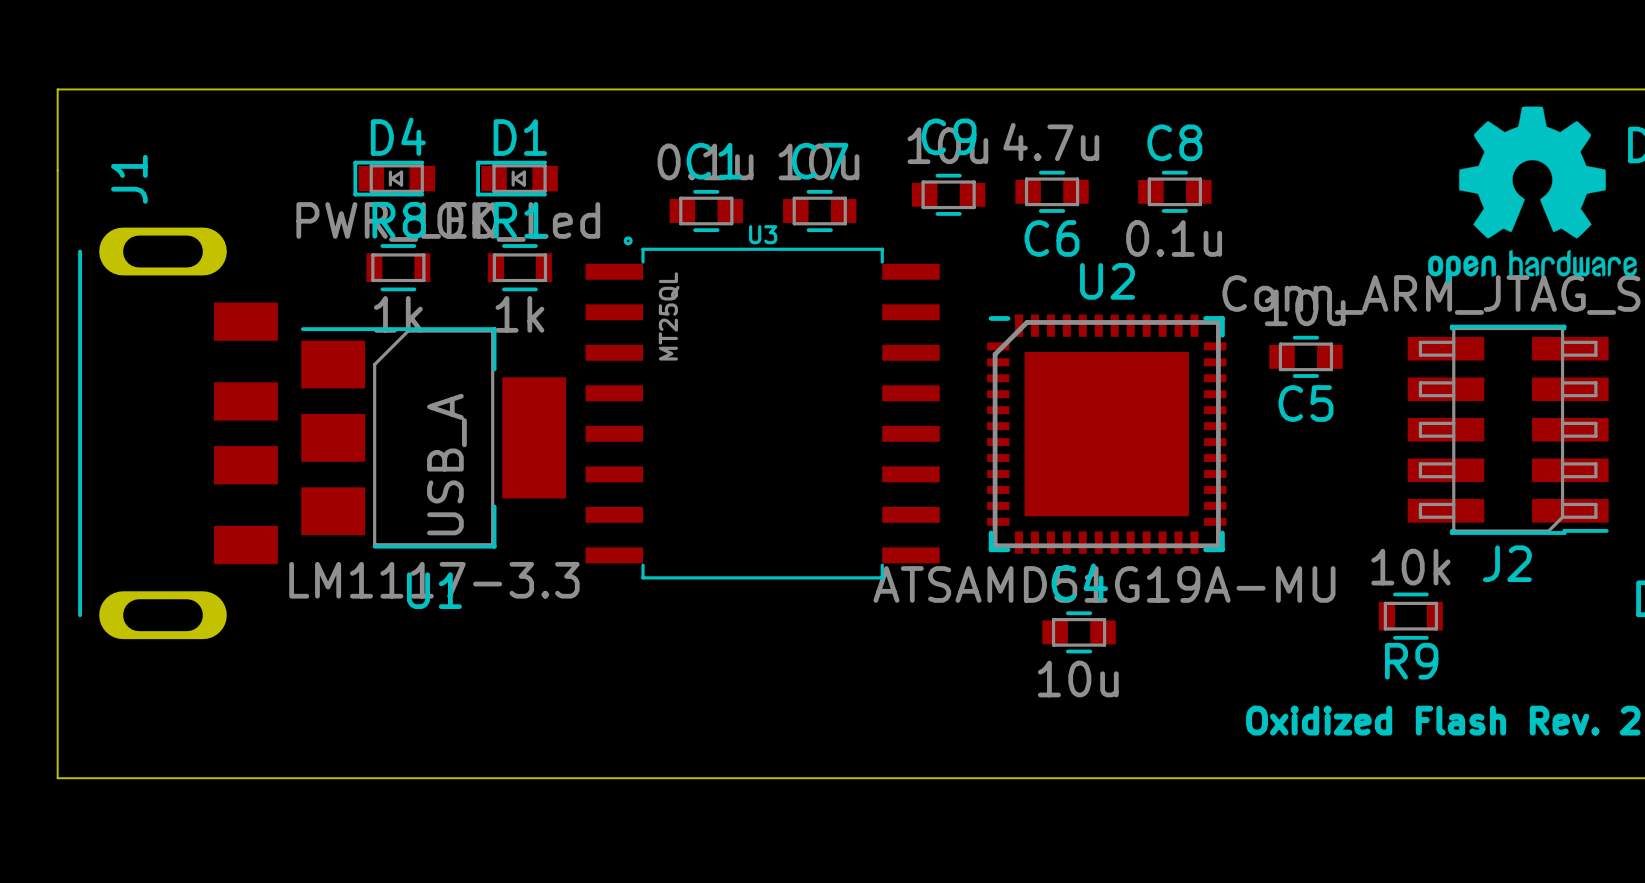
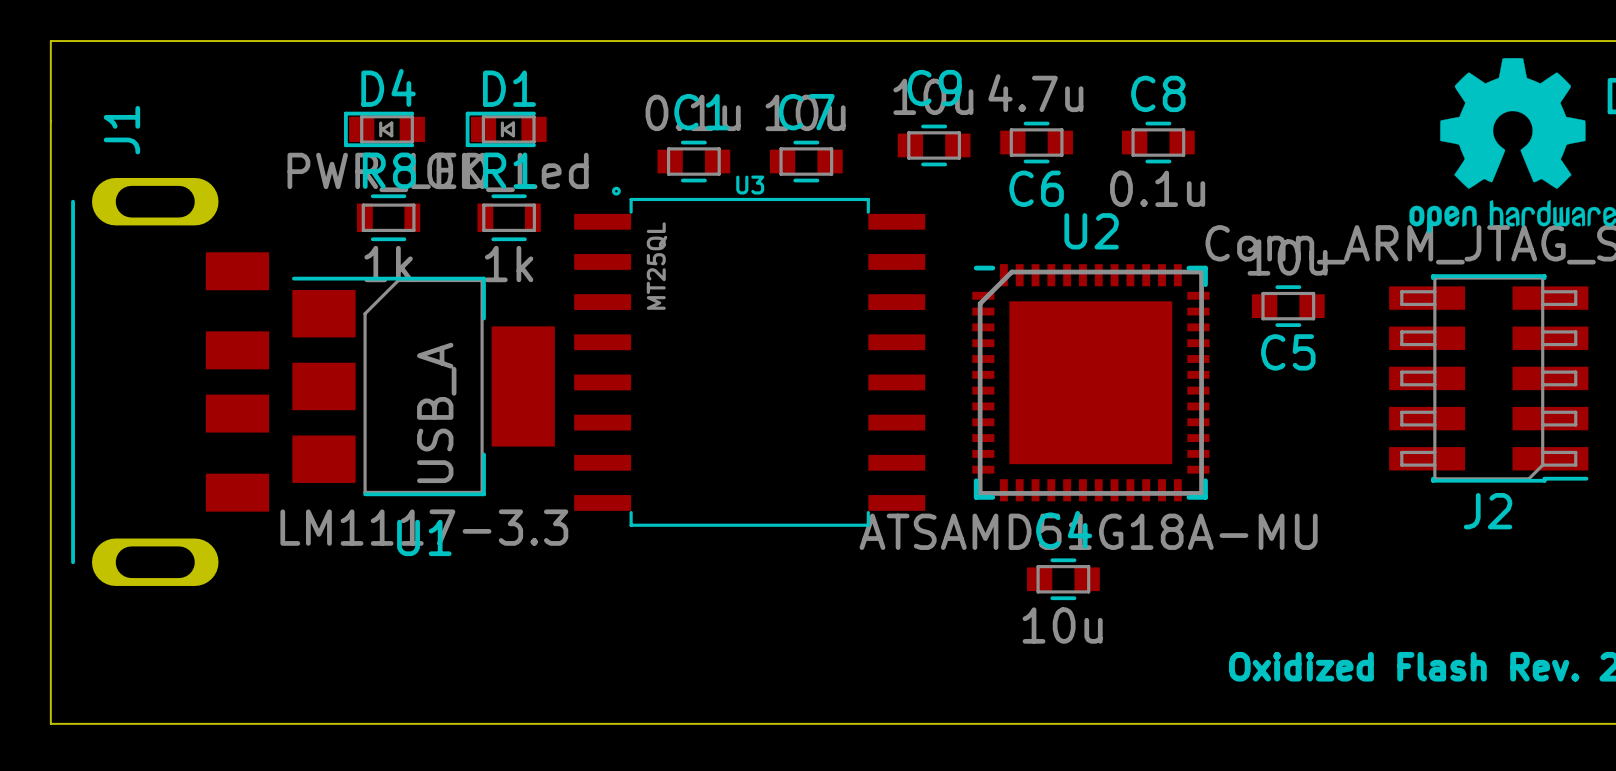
U2 value: ATSAMD51G19A-MU (1104, 584) -> ATSAMD51G18A-MU (1088, 531)
R9: 10k (1410, 616) -> none

